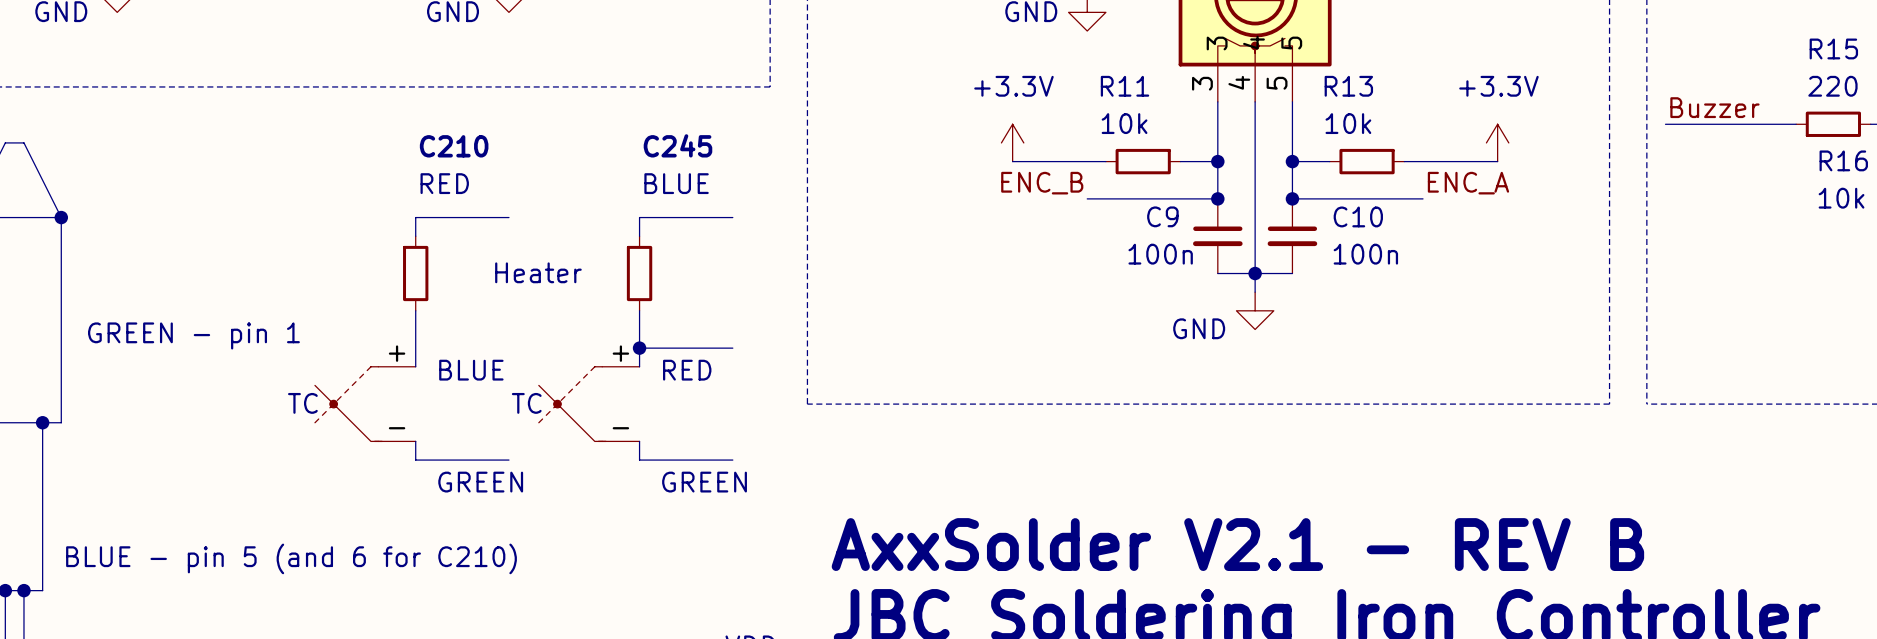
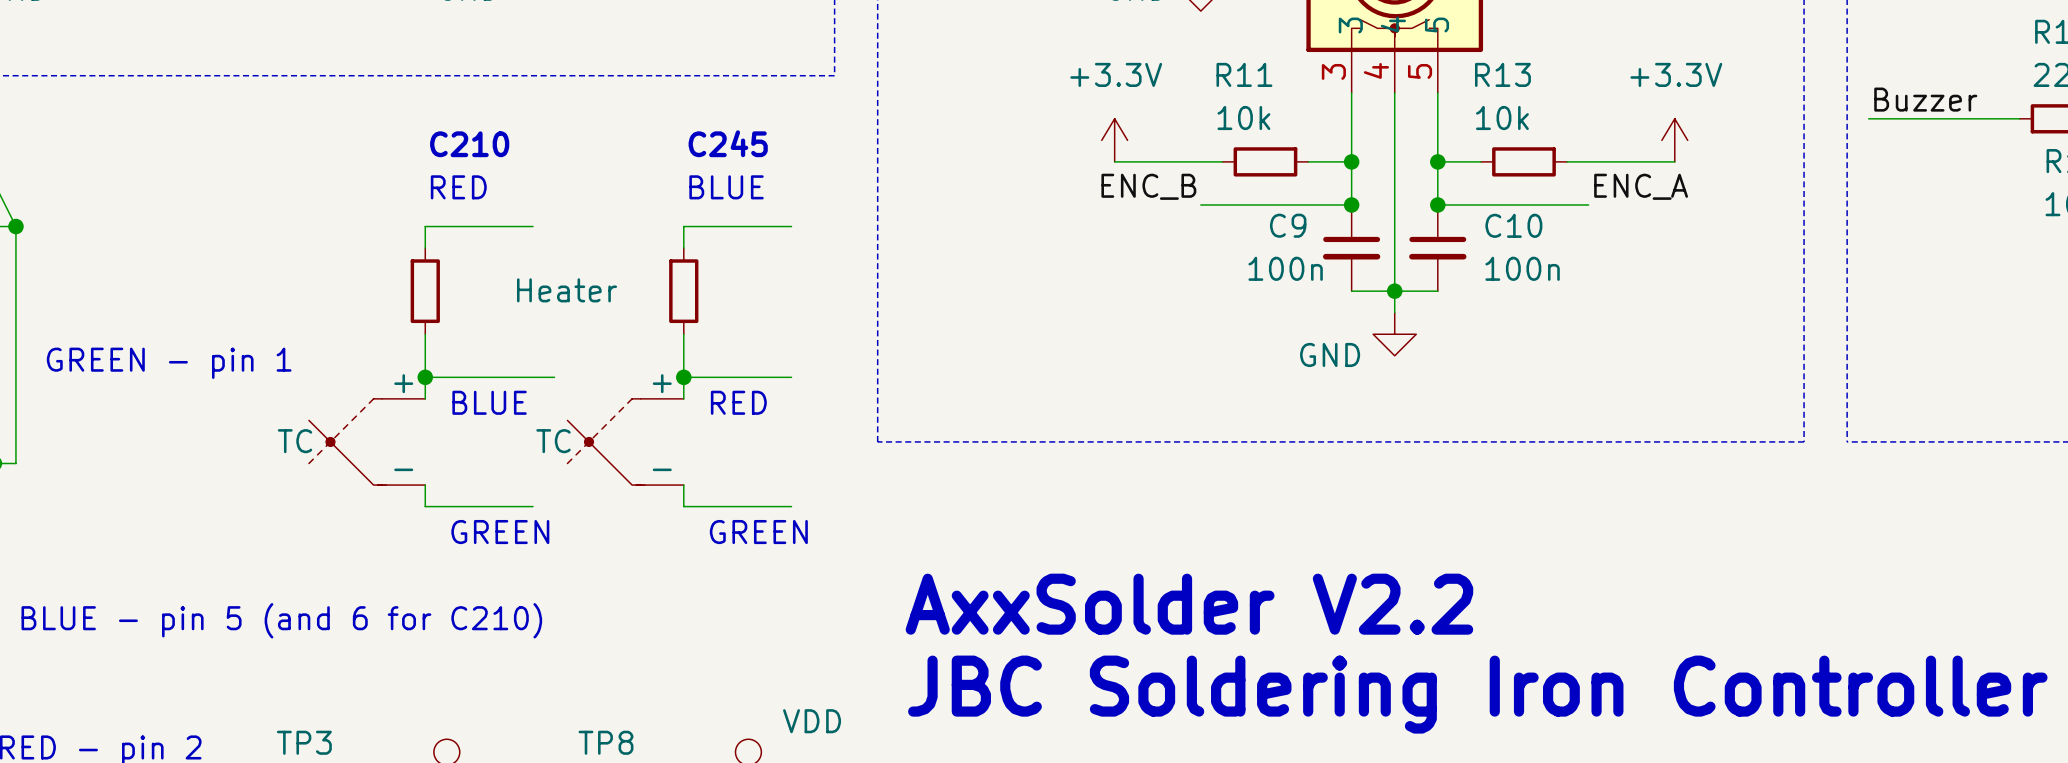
wire: none -> (425, 377) (554, 377)
junction: none -> (425, 377)
text: AxxSolder V2.1 - REV B (1237, 544) -> AxxSolder V2.2 (1189, 604)

